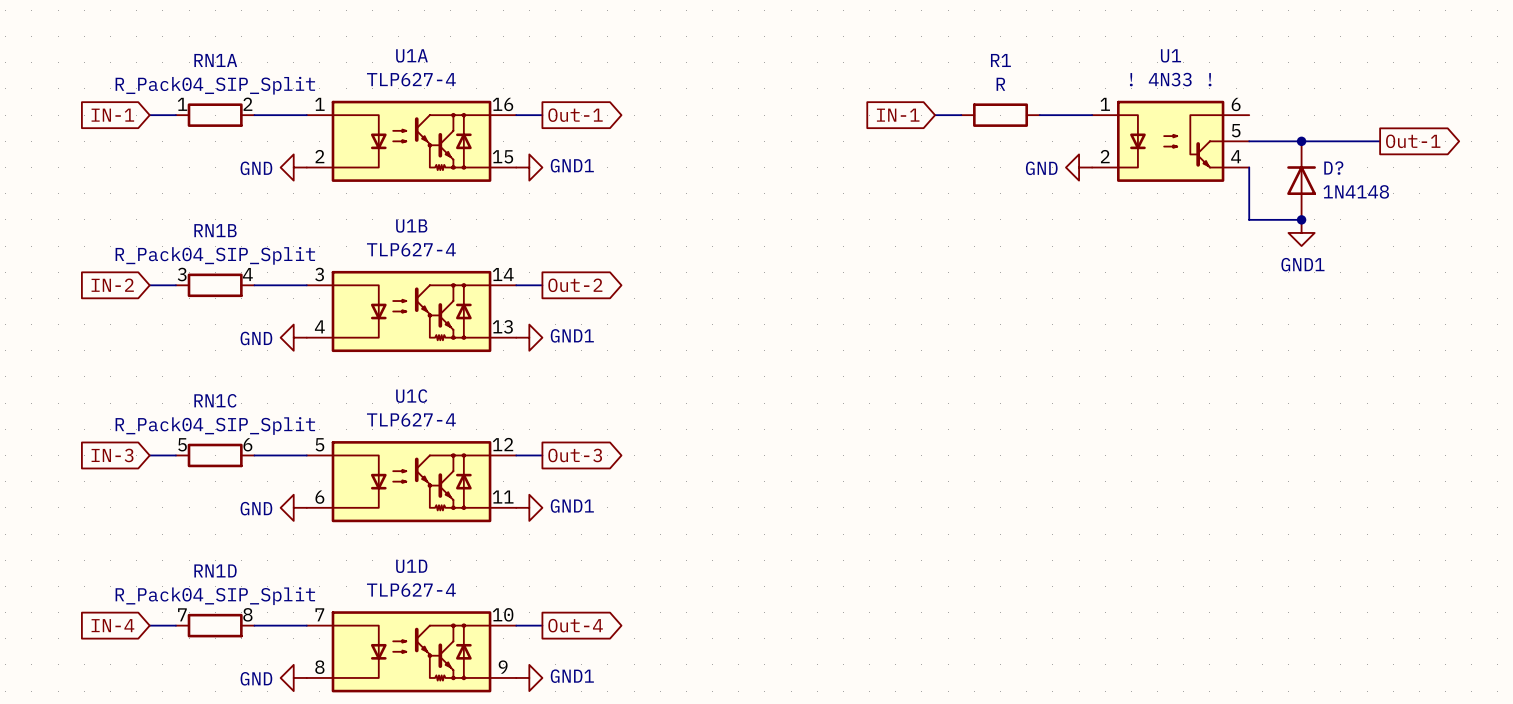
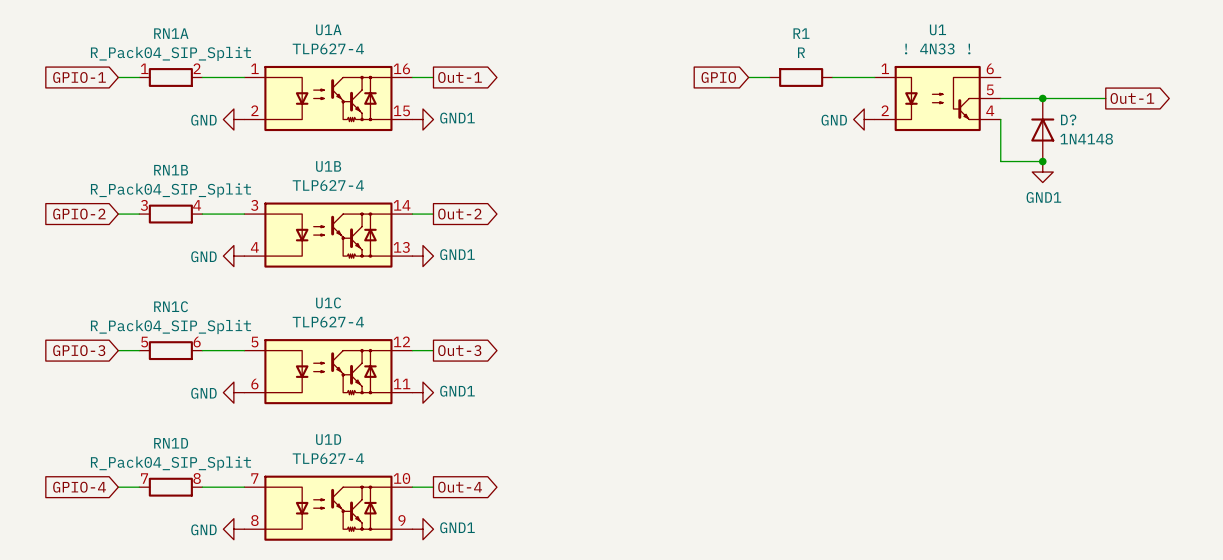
global label: IN-1 (112, 115) -> GPIO-1 (79, 77)
global label: IN-1 (898, 115) -> GPIO (718, 77)
global label: IN-2 (112, 285) -> GPIO-2 (79, 214)
global label: IN-3 (112, 455) -> GPIO-3 (79, 350)
global label: IN-4 (112, 625) -> GPIO-4 (79, 487)

